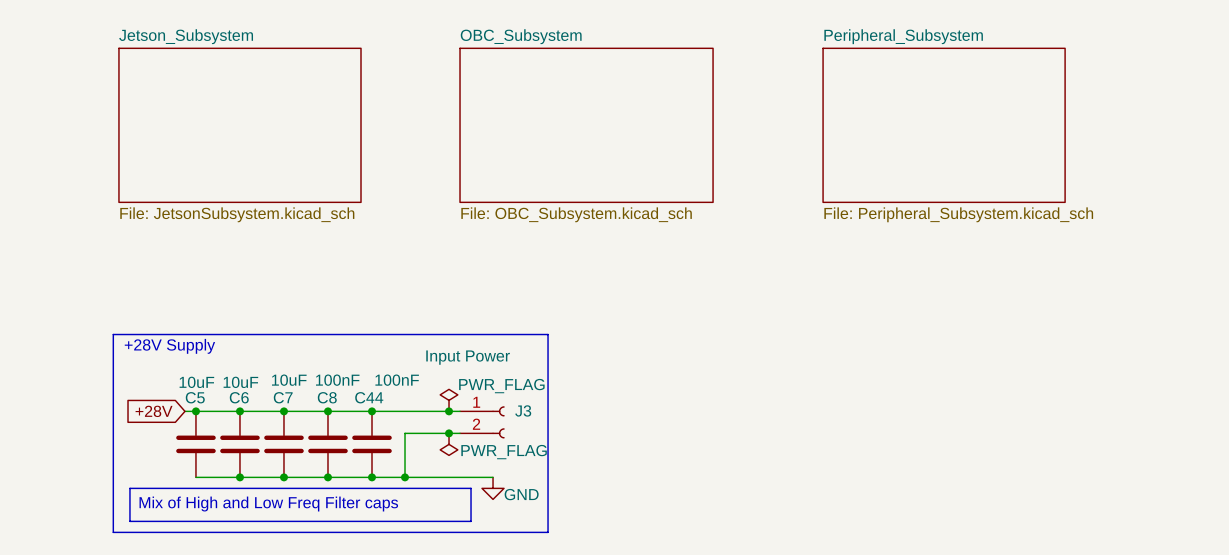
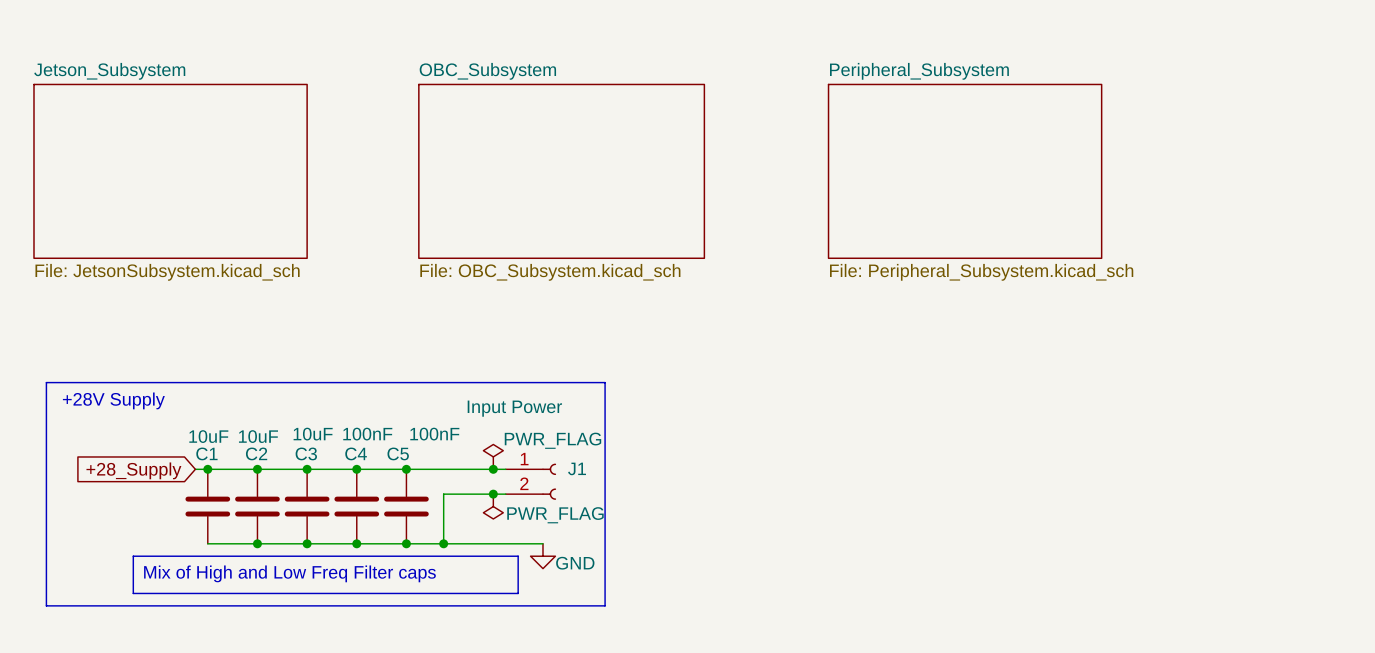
sheet Jetson_Subsystem position: (239, 125) -> (170, 171)
sheet OBC_Subsystem position: (586, 125) -> (561, 171)
sheet Peripheral_Subsystem position: (944, 125) -> (965, 171)
line: (113, 334) (113, 532) -> (114, 382) (46, 382) (46, 605) (114, 605)
text position: +28V Supply (169, 346) -> +28V Supply (113, 400)
C5 name: C5 (195, 397) -> C1 (206, 453)
C6 name: C6 (239, 397) -> C2 (256, 453)
C7 name: C7 (283, 397) -> C3 (306, 453)
C8 name: C8 (327, 397) -> C4 (356, 453)
C44 name: C44 (369, 397) -> C5 (398, 453)
J3 name: J3 (523, 410) -> J1 (577, 468)
global label: +28V (154, 411) -> +28_Supply (133, 470)

